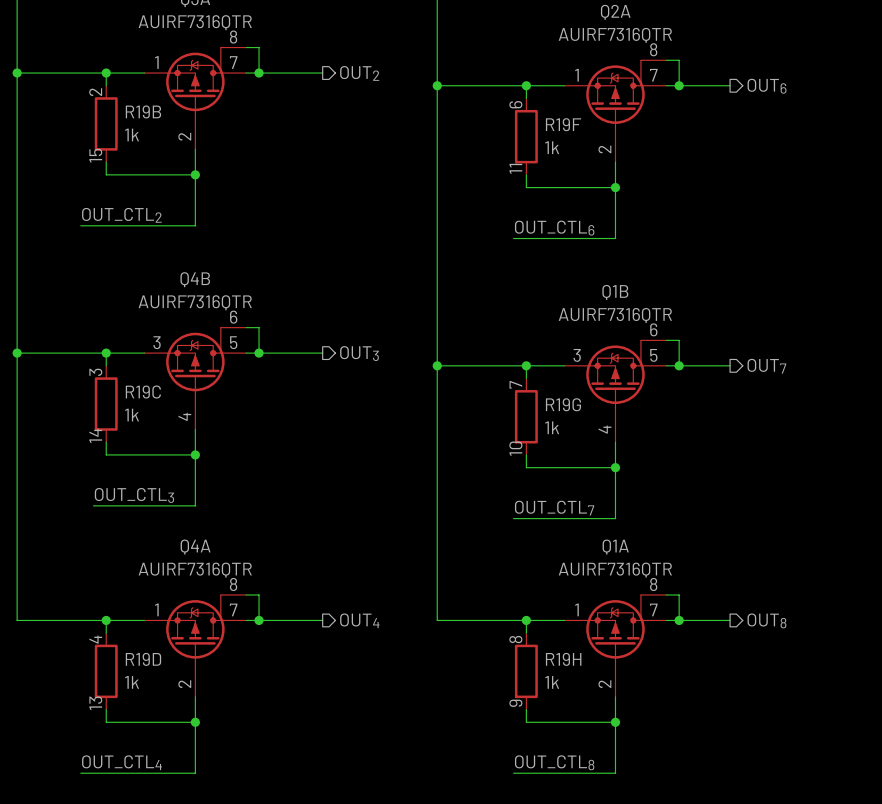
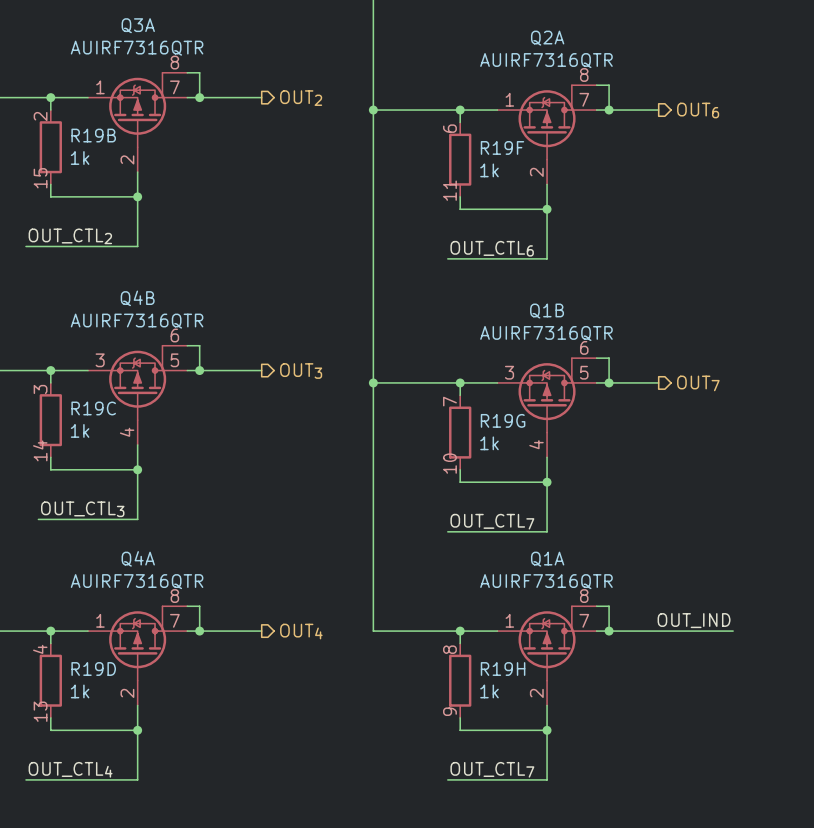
label: none -> OUT_IND (694, 620)
wire: none -> (658, 631) (733, 631)
hierarchical label: OUT8 (766, 620) -> none
label: OUT_CTL8 (554, 762) -> OUT_CTL7 (492, 769)

